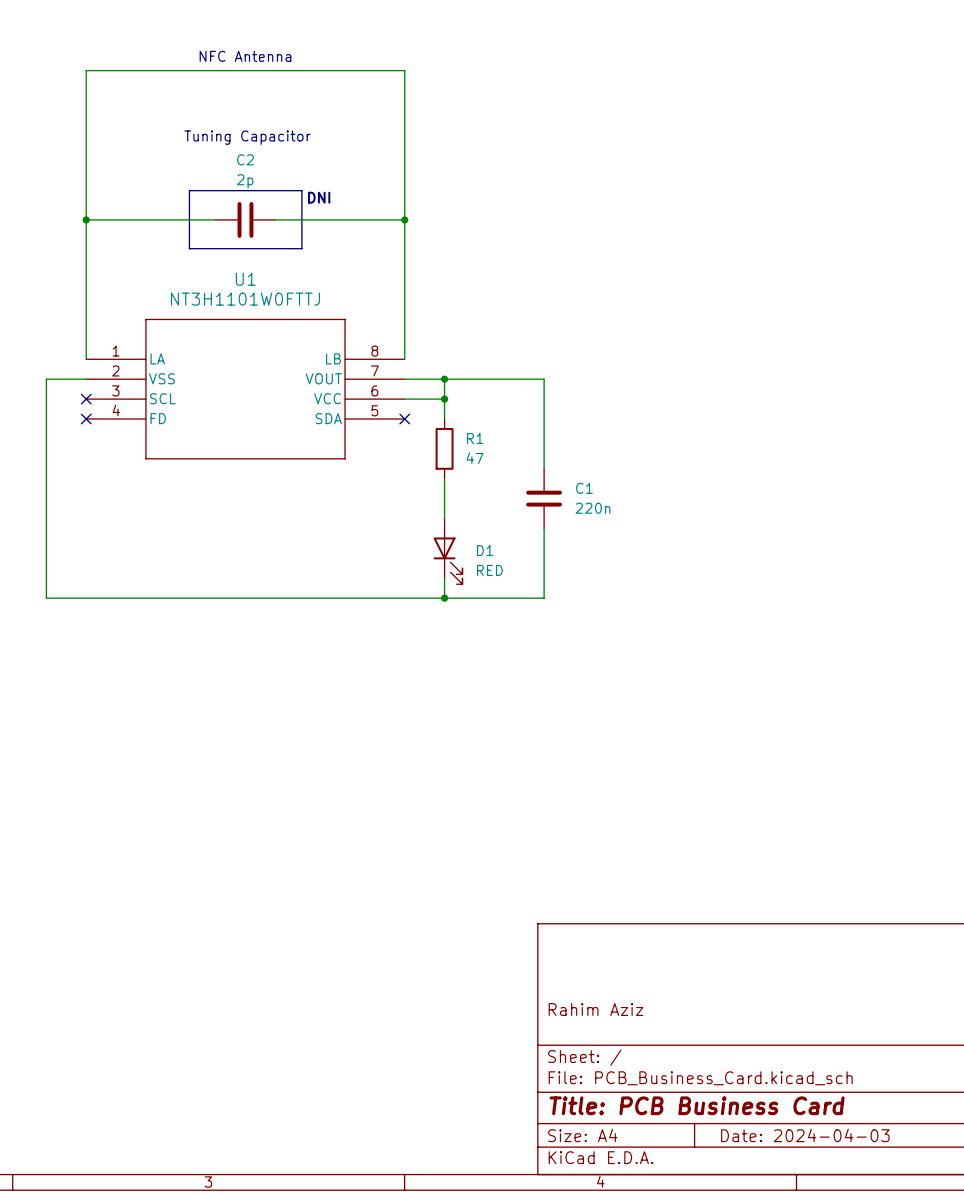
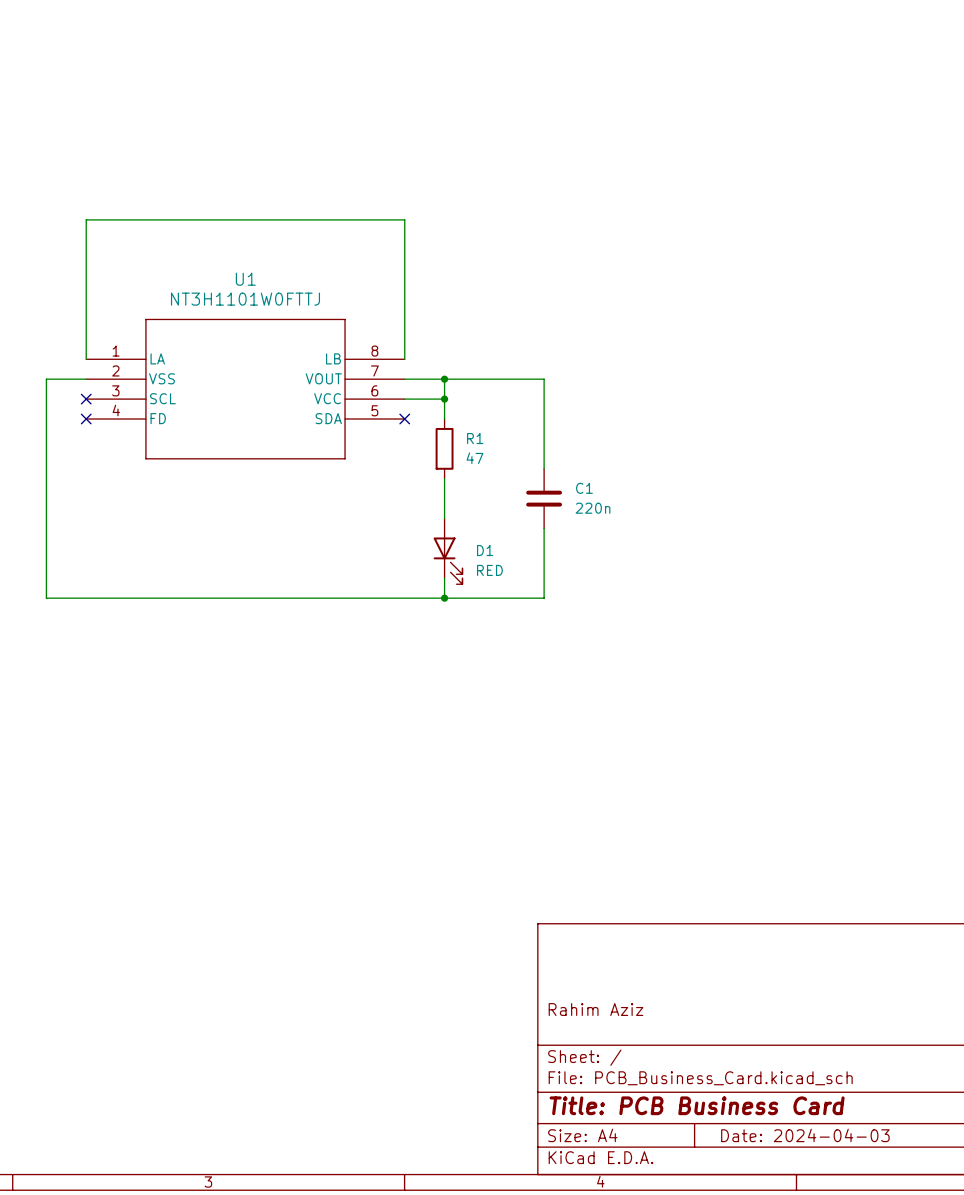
text: NFC Antenna (245, 56) -> none
text: Tuning Capacitor (247, 137) -> none
line: (189, 190) (301, 190) (301, 248) (189, 248) (189, 190) -> none
text: DNI (319, 197) -> none
wire: (86, 219) (86, 70) (404, 70) (404, 219) -> none
junction: (86, 219) -> none
C2: 2p (245, 219) -> none
junction: (404, 219) -> none

